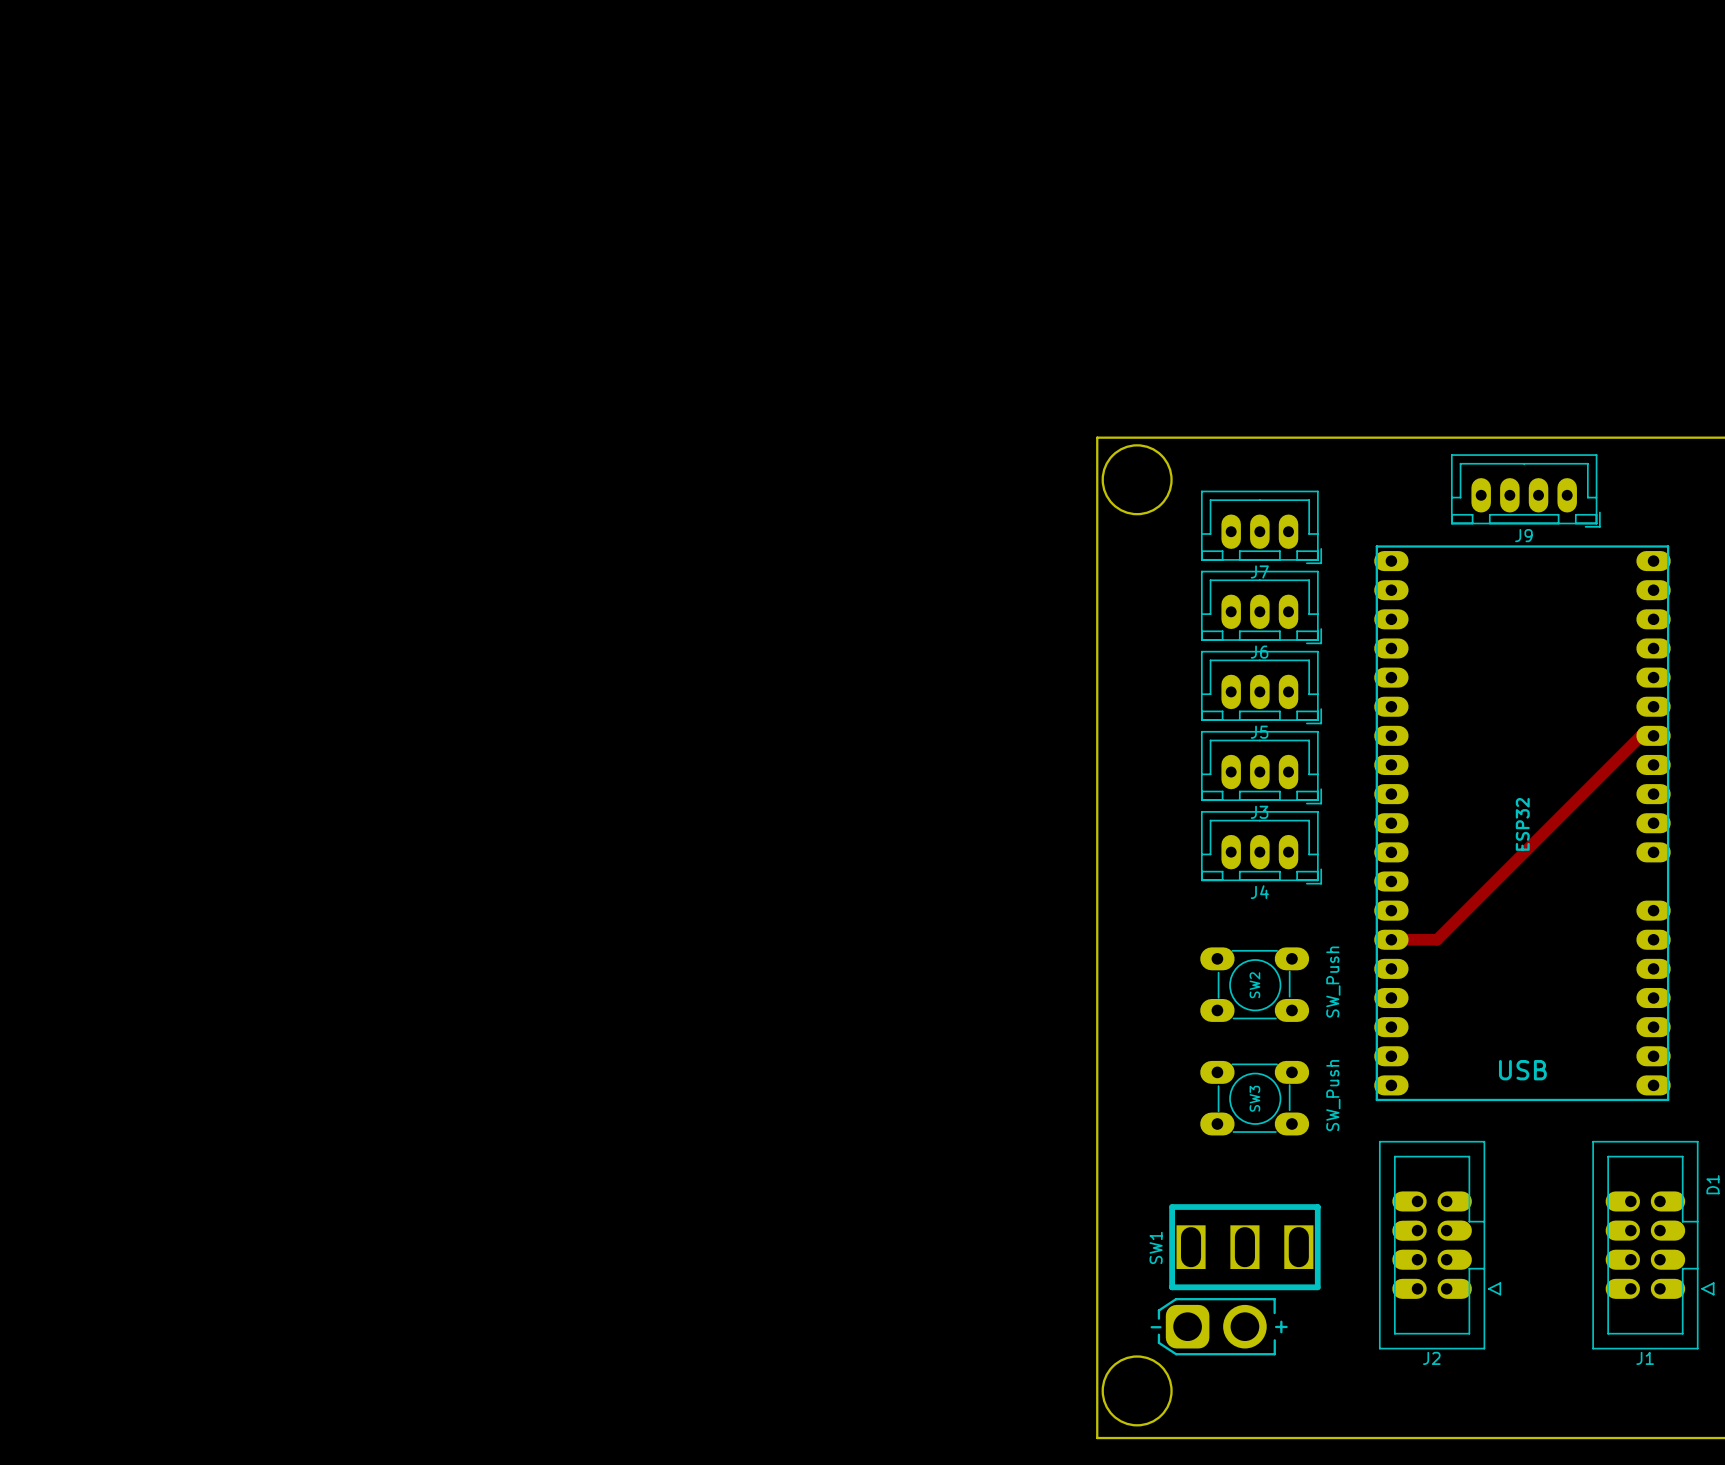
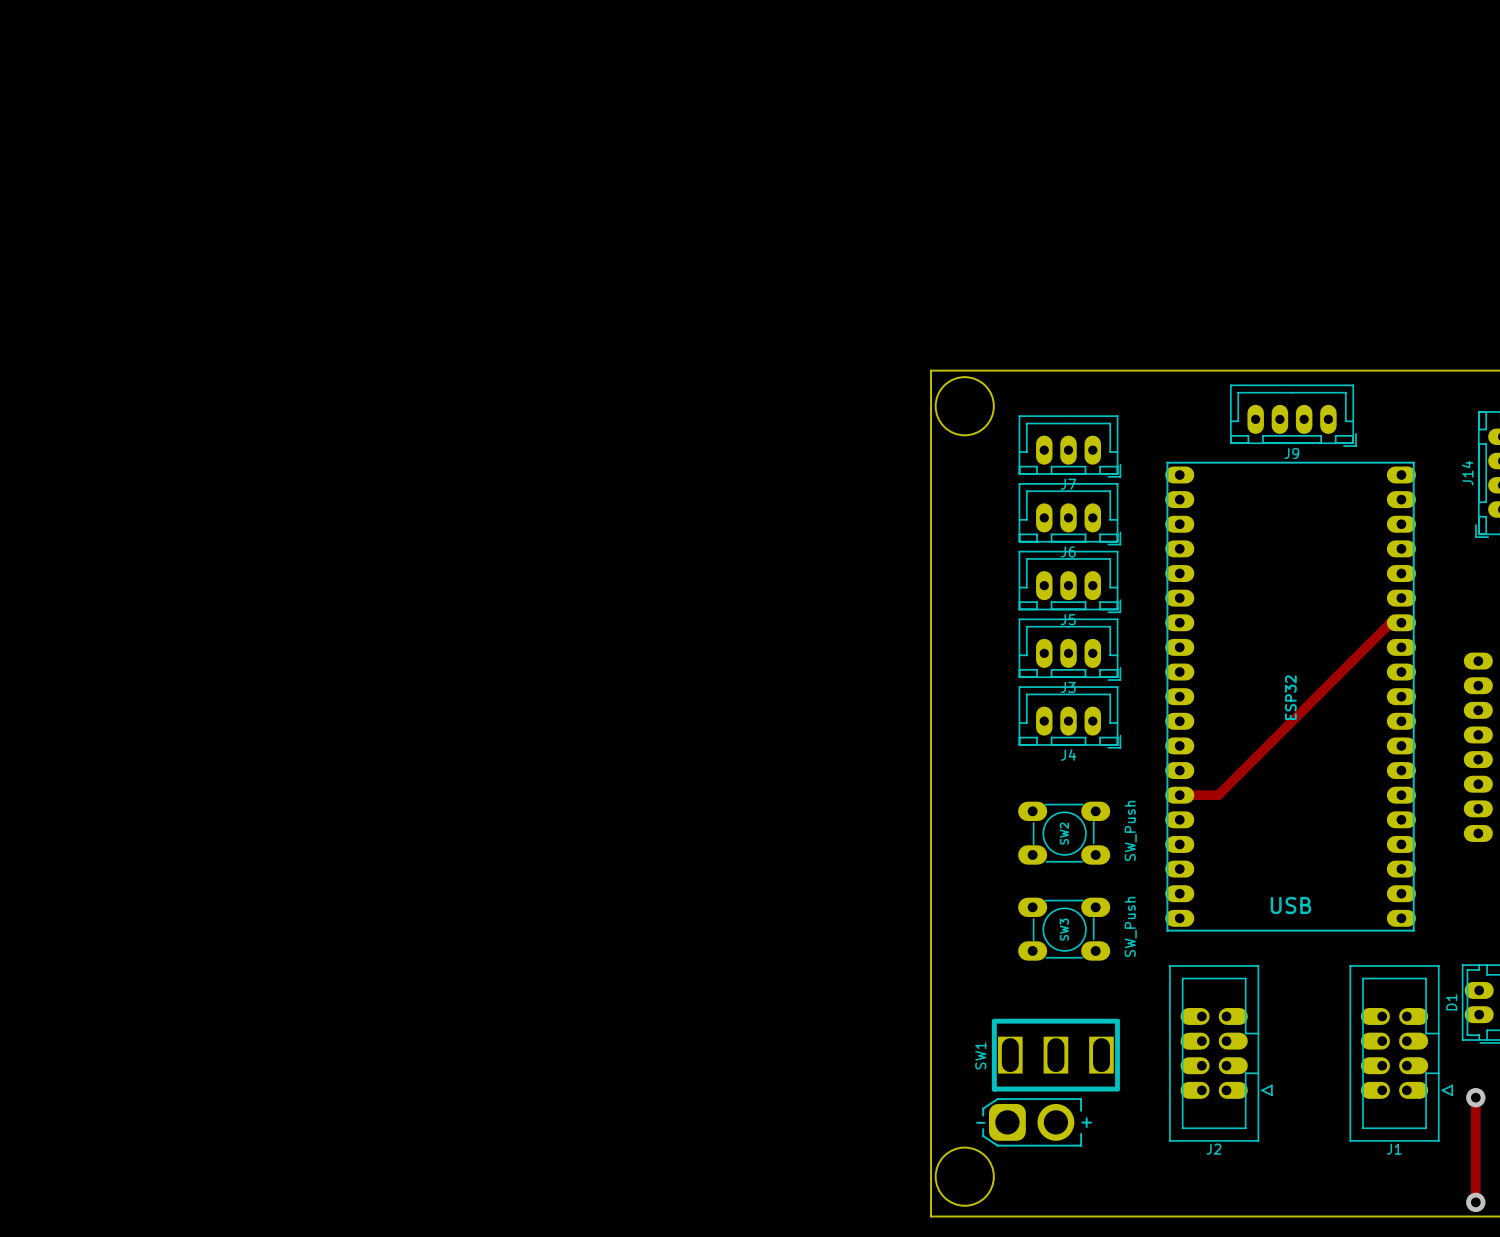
ESP32 footprint: [1374, 545, 1671, 1102] -> [1165, 461, 1416, 932]

